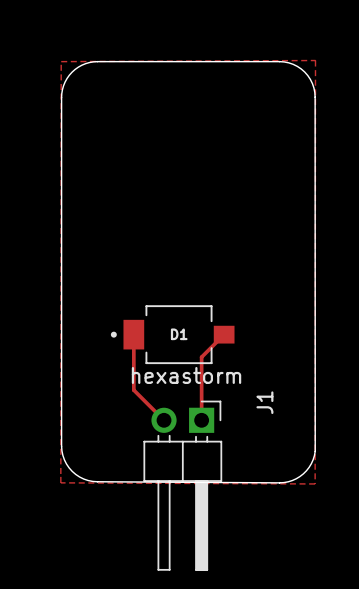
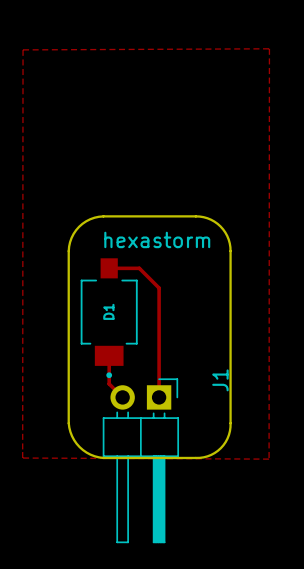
board edge: (97, 61) (284, 61) (301, 68) (312, 83) (315, 97) (315, 451) (309, 467) (296, 478) (279, 482) (92, 481) (75, 474) (64, 459) (61, 446) (61, 93) (65, 81) (72, 72) (85, 63) (97, 61) -> none
board edge: none -> (103, 216) (199, 216) (214, 221) (227, 235) (230, 251) (230, 427) (225, 442) (211, 454) (199, 457) (99, 457) (82, 450) (72, 436) (68, 423) (69, 246) (71, 237) (79, 226) (90, 219) (103, 216)
track: (133, 334) (133, 390) (150, 406) -> (109, 355) (109, 383)
D1 rotation: 0° (172, 334) -> 90° counterclockwise (109, 318)
track: (224, 334) (201, 357) -> (109, 268) (139, 268) (159, 288) (159, 336)
text position: hexastorm (186, 375) -> hexastorm (157, 239)

